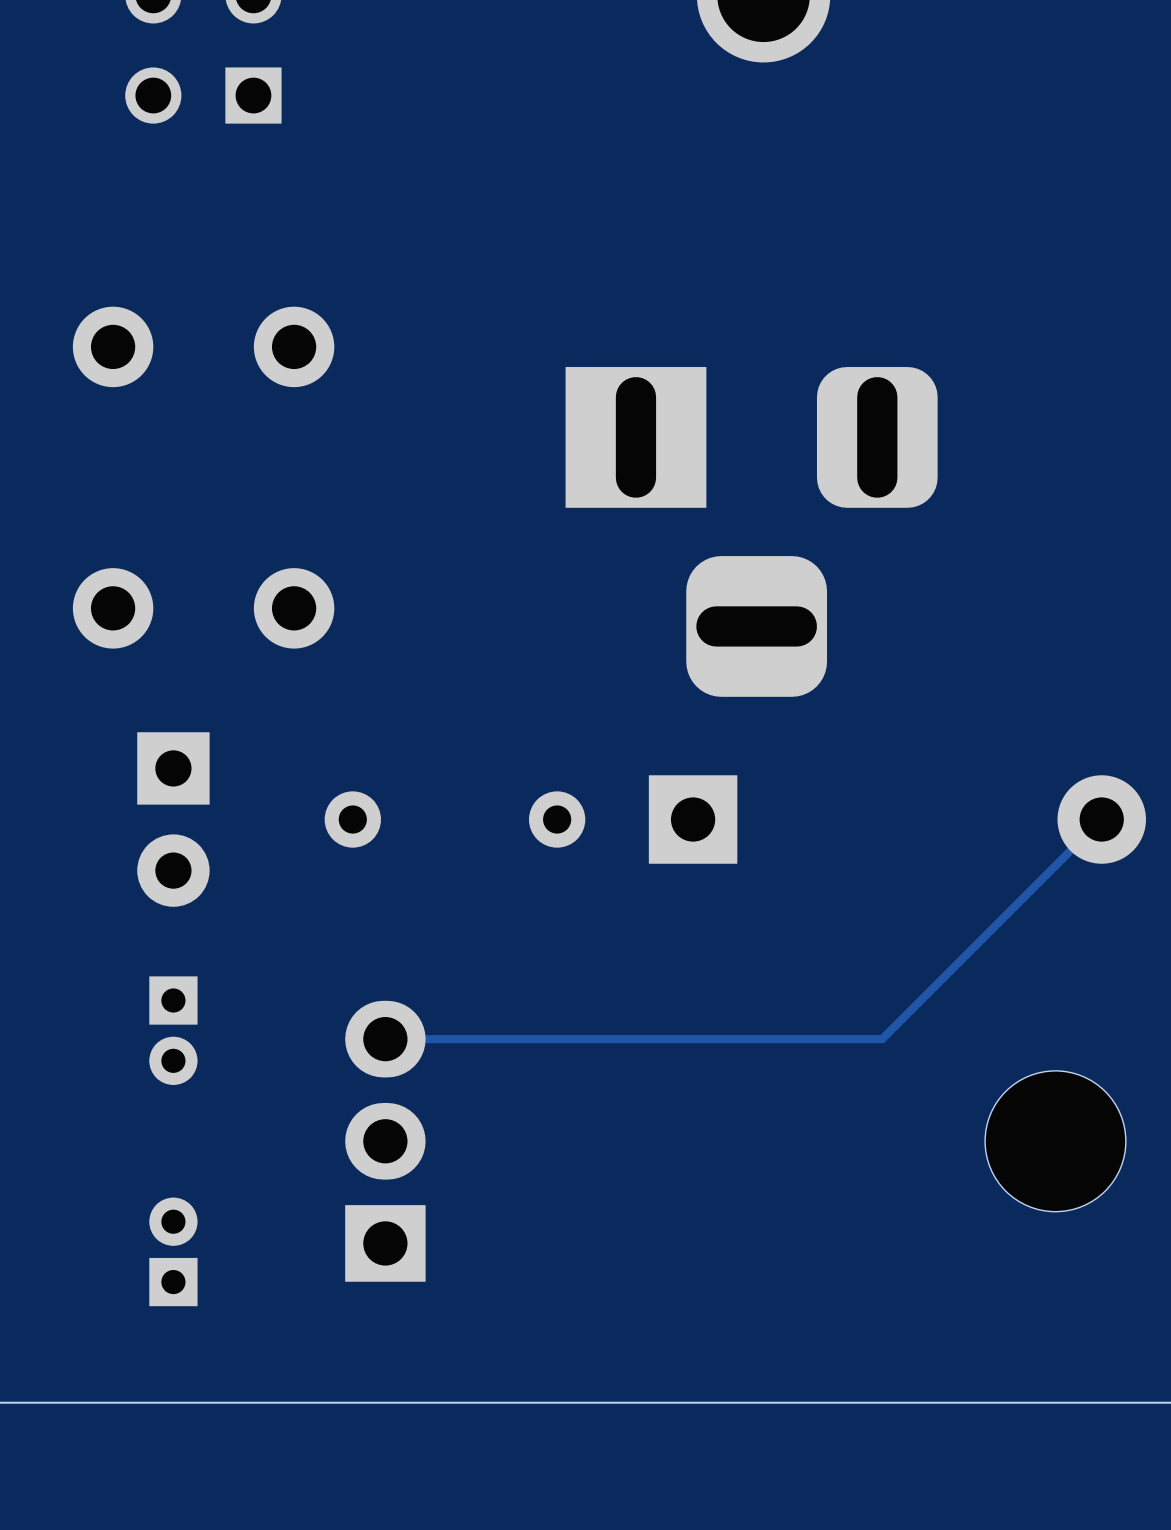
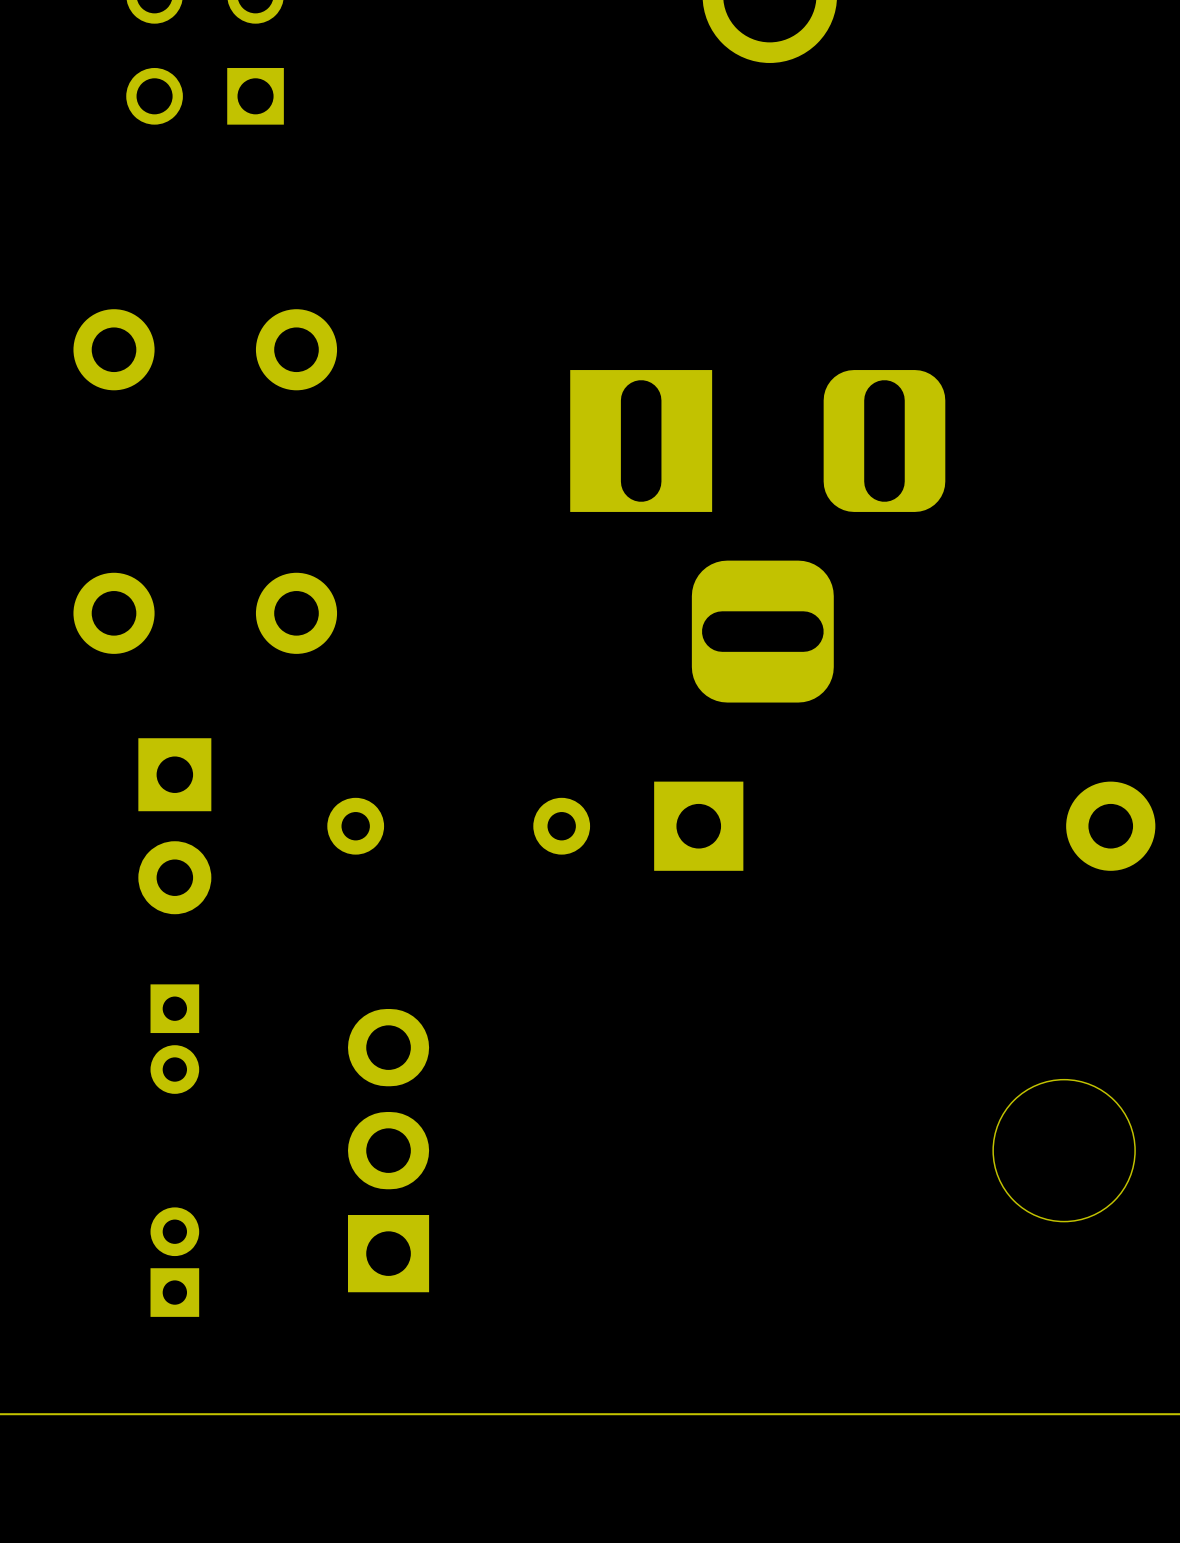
track: (1101, 819) (882, 1039) (385, 1039) -> none

